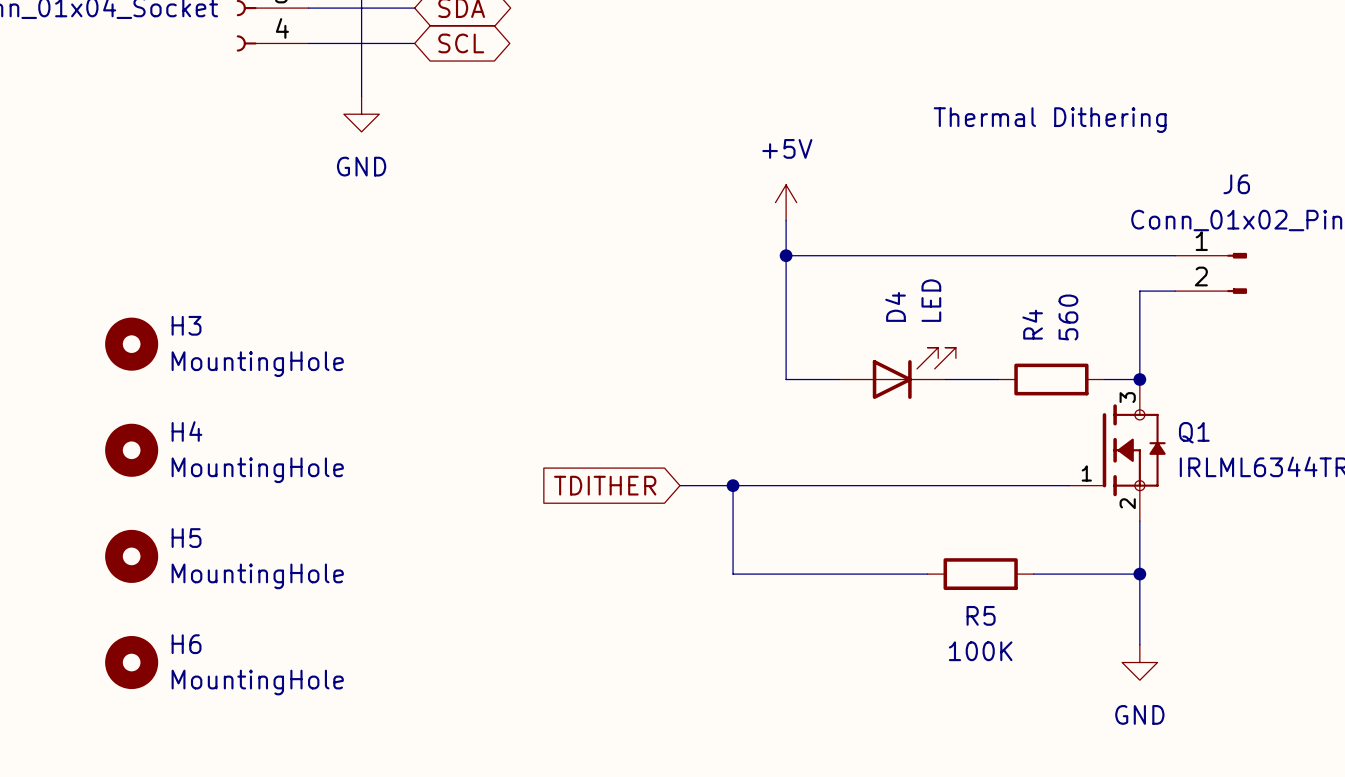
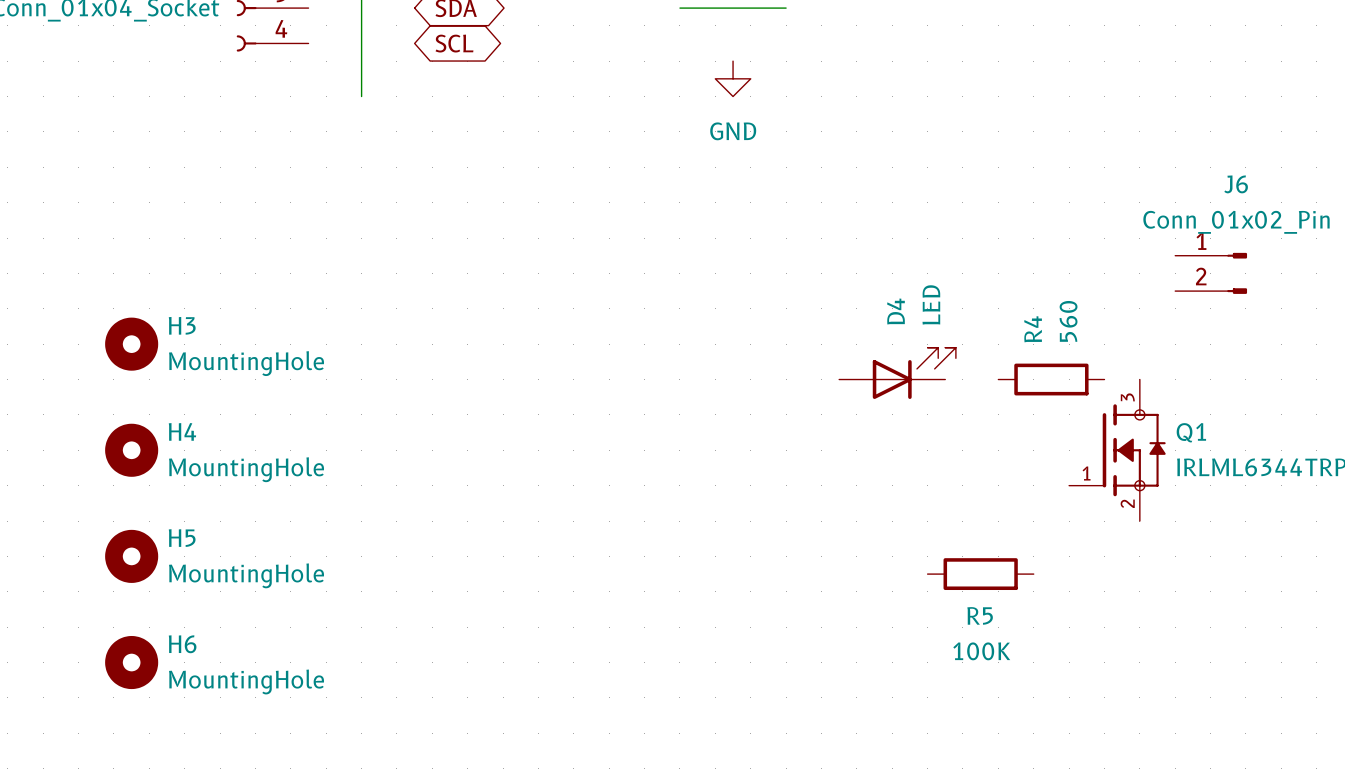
wire: (308, 8) (414, 8) -> none
wire: none -> (679, 8) (786, 8)
wire: (308, 43) (414, 43) -> none
power symbol: none -> GND (733, 78)
power symbol: GND (361, 114) -> none
text: Thermal Dithering (1050, 120) -> none
power symbol: +5V (786, 202) -> none
wire: (786, 220) (786, 379) (839, 379) -> none
wire: (786, 255) (1175, 255) -> none
junction: (786, 255) -> none
wire: (1175, 291) (1139, 291) (1139, 379) (1104, 379) -> none
wire: (945, 379) (998, 379) -> none
junction: (1139, 379) -> none
global label: TDITHER (605, 485) -> none
wire: (679, 485) (1069, 485) -> none
wire: (733, 485) (733, 574) (927, 574) -> none
junction: (733, 485) -> none
wire: (1139, 521) (1139, 644) -> none
wire: (1033, 574) (1139, 574) -> none
junction: (1139, 574) -> none
power symbol: GND (1139, 662) -> none

